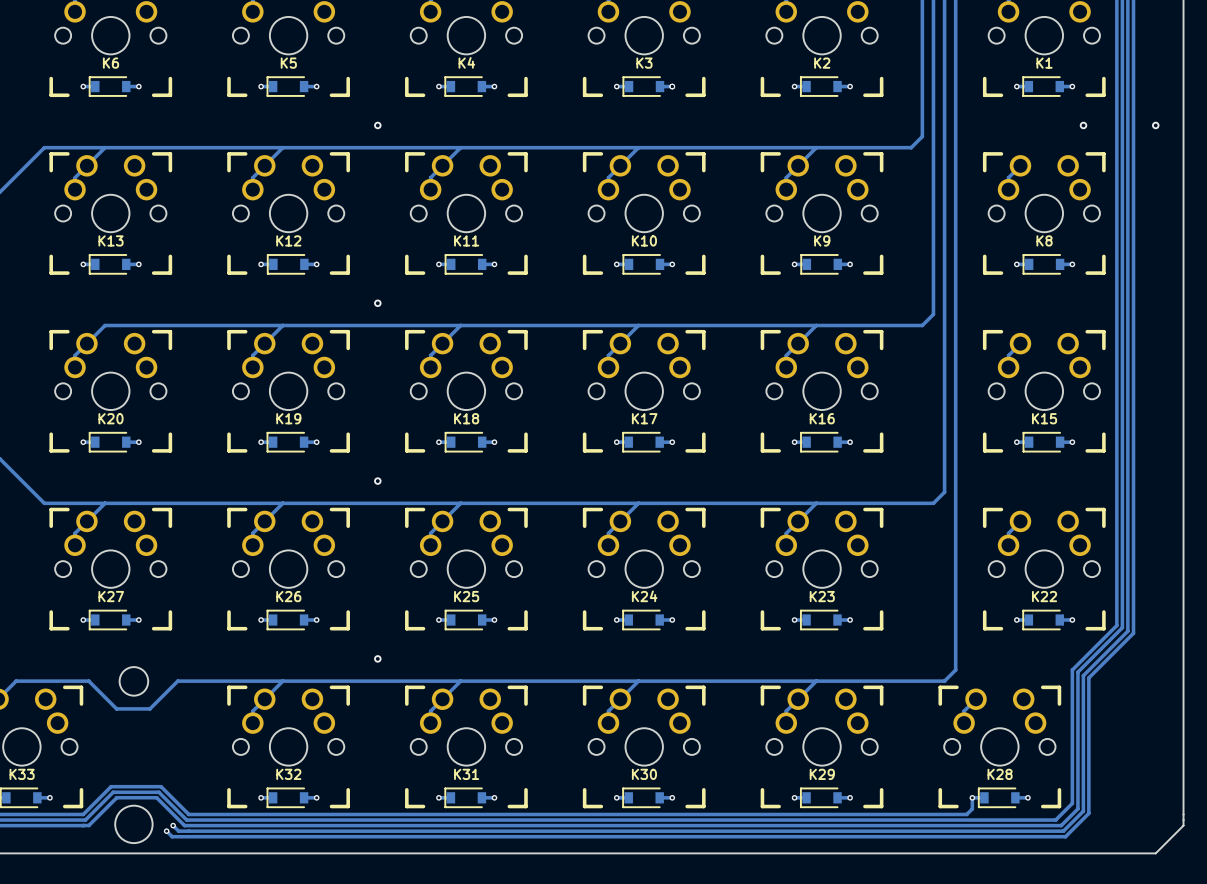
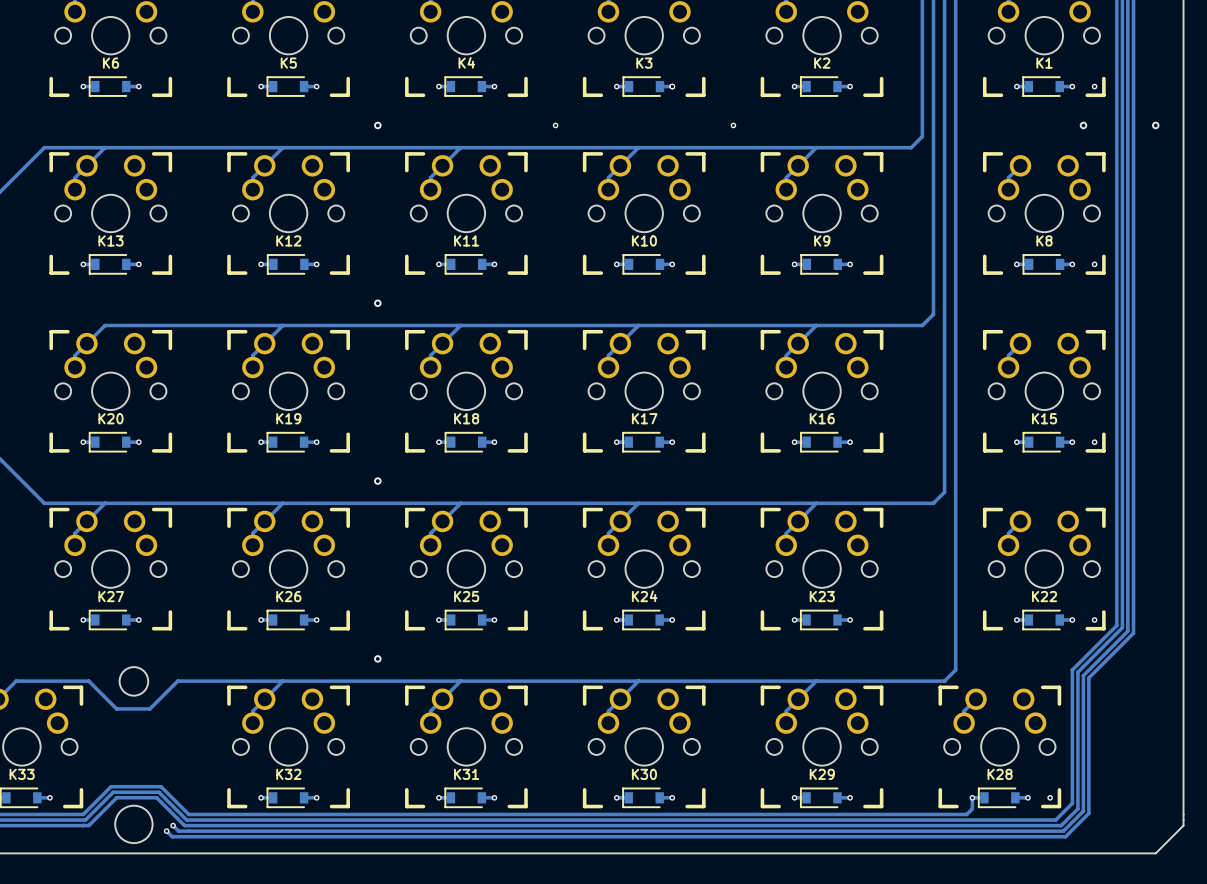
via: none -> (1094, 86)
via: none -> (555, 125)
via: none -> (733, 125)
via: none -> (1094, 264)
via: none -> (1094, 442)
via: none -> (1094, 620)
via: none -> (1050, 797)

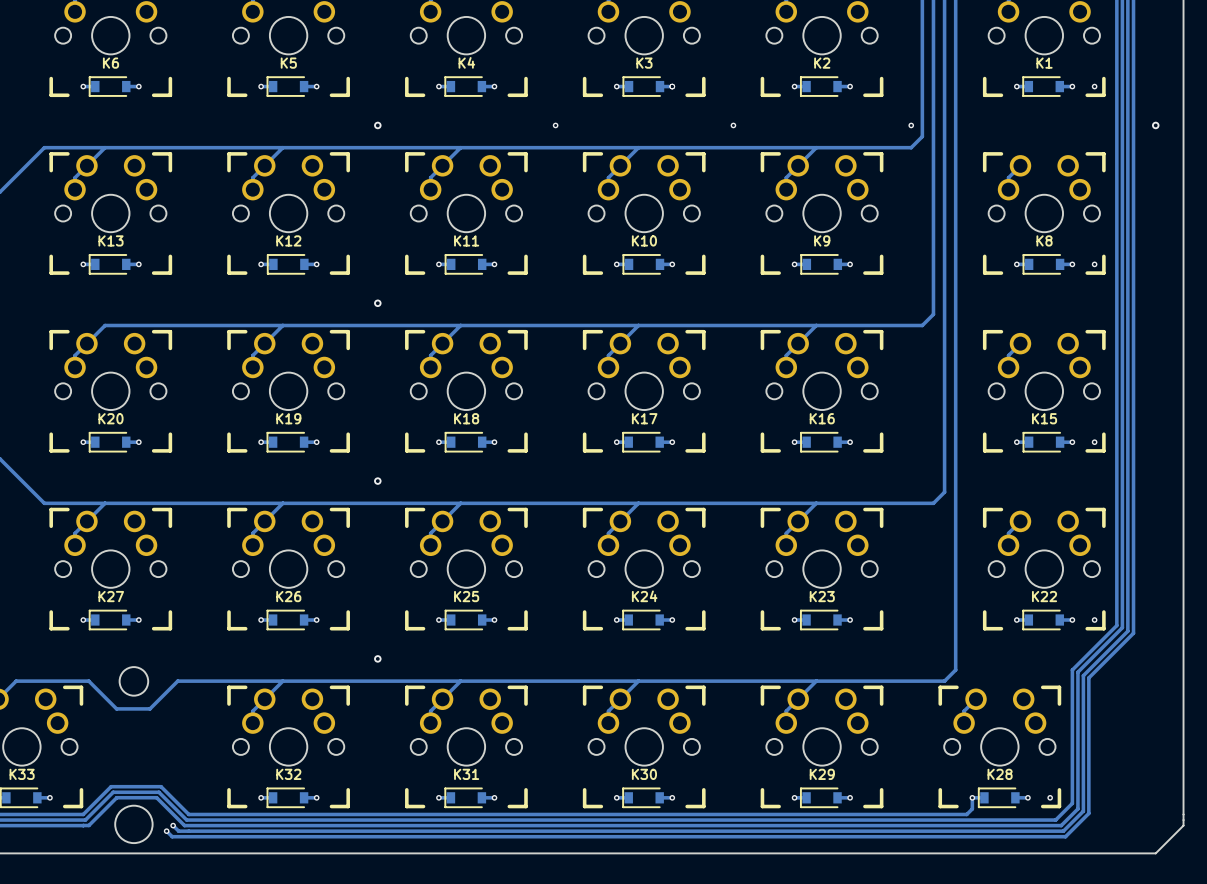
via: none -> (911, 125)
via: (1083, 125) -> none

